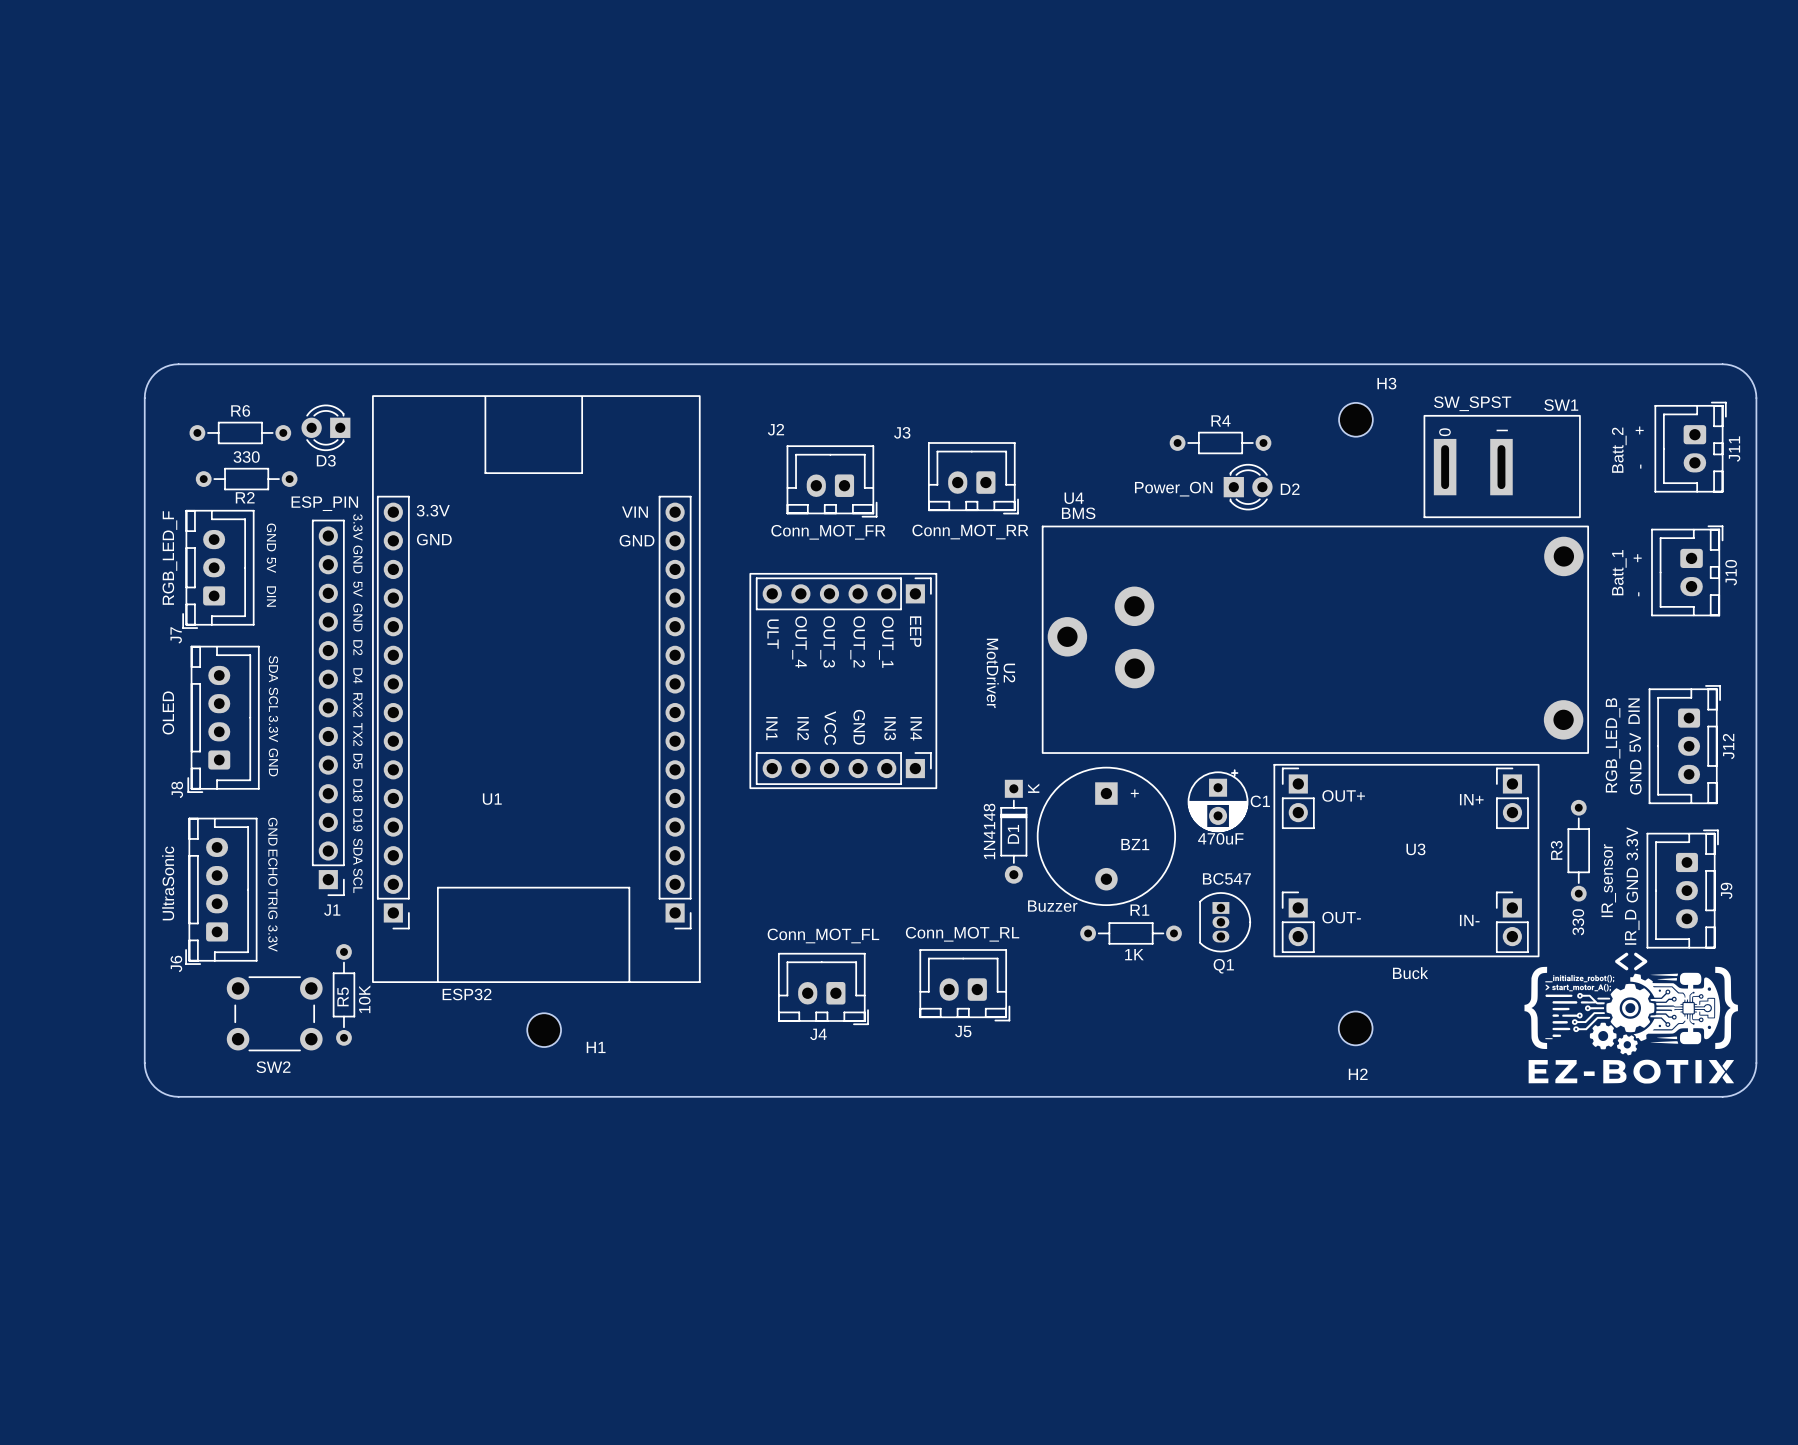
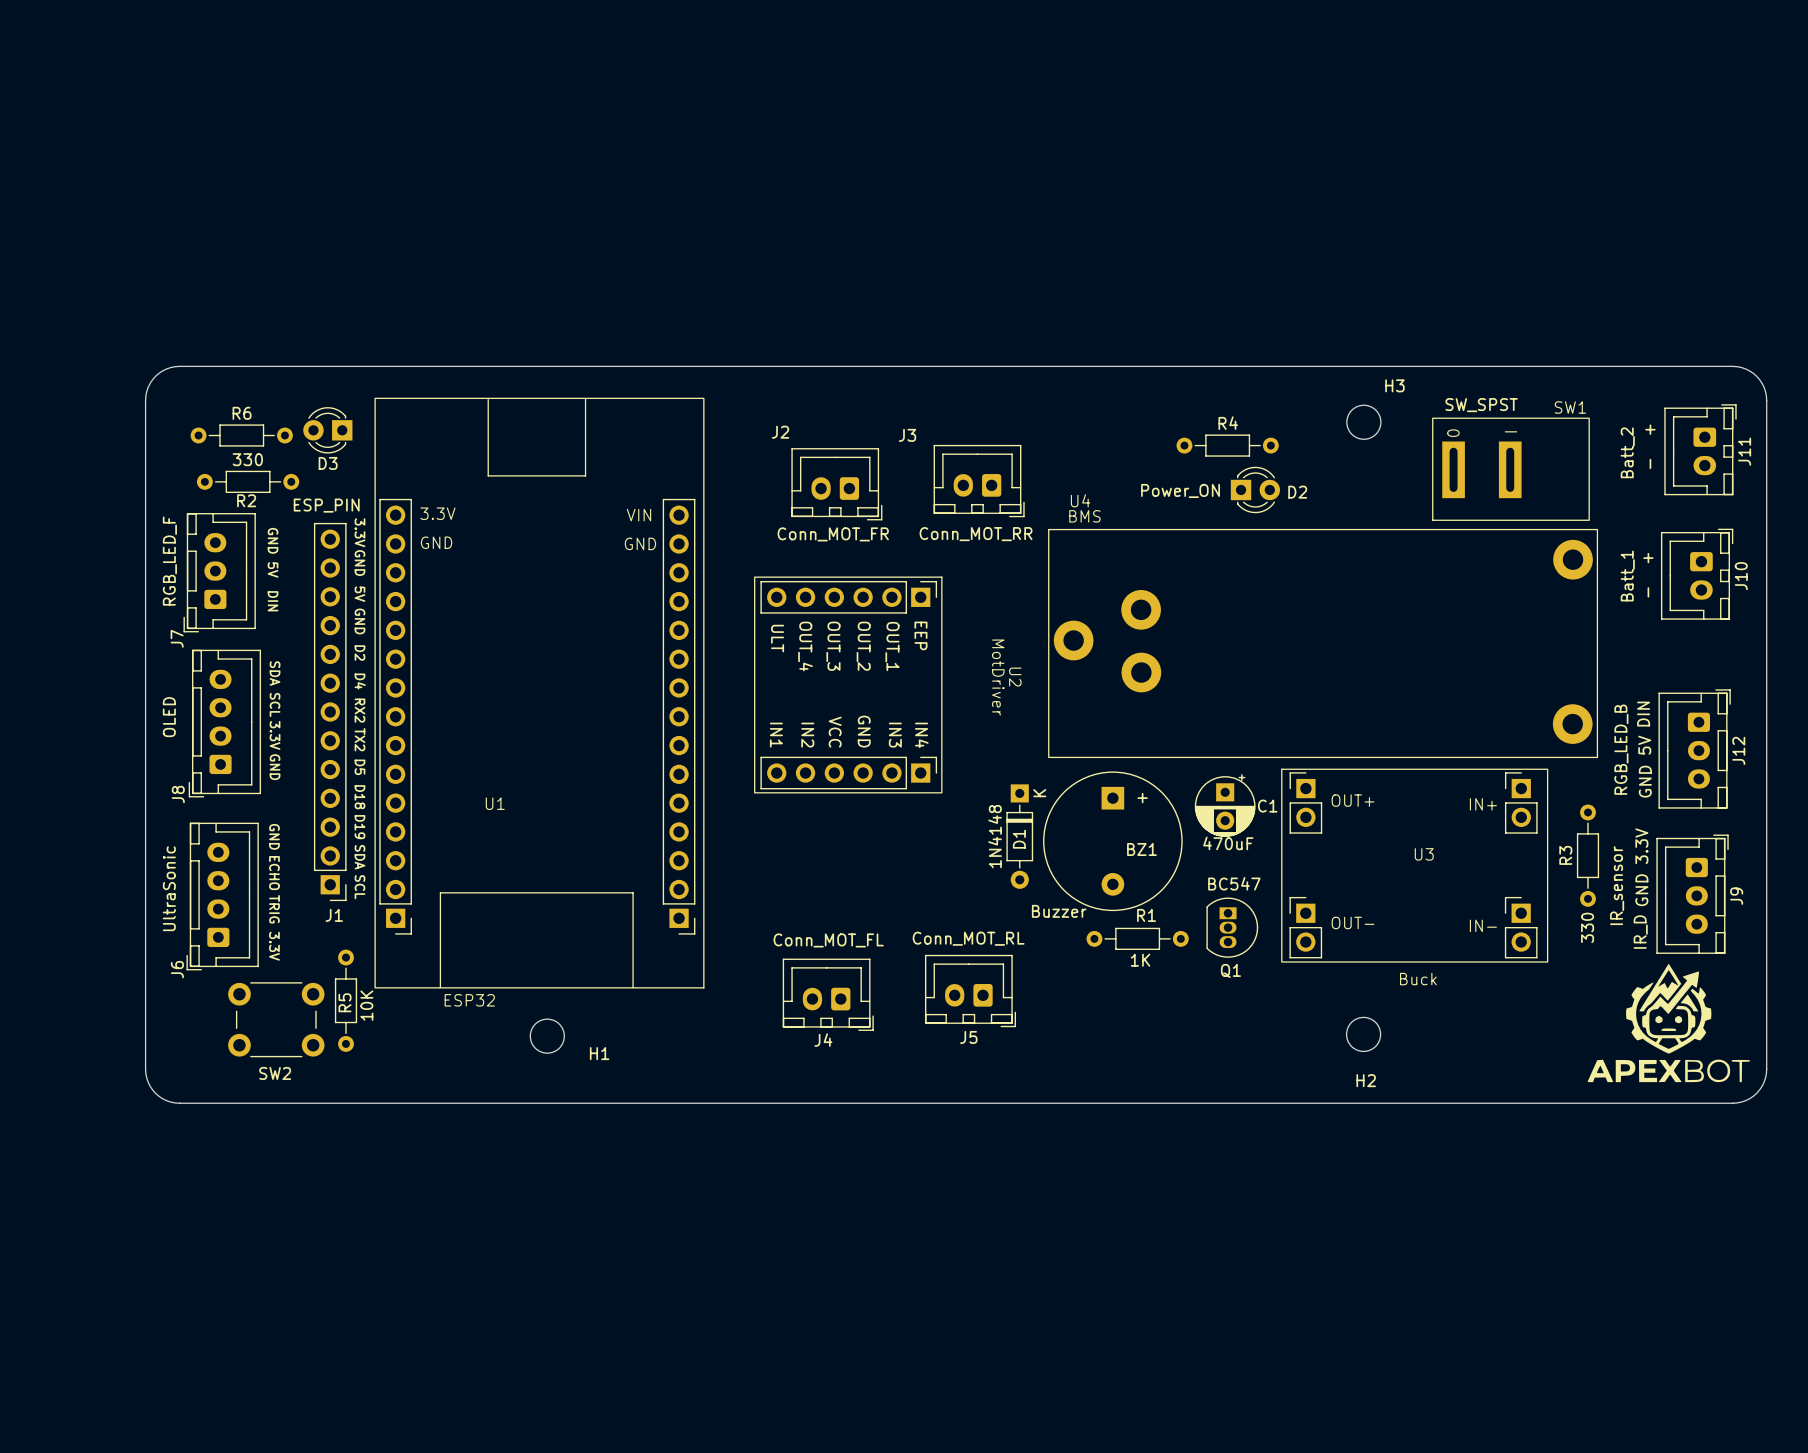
drawing: [1524, 952, 1738, 1084] -> none
drawing: none -> [1587, 963, 1750, 1083]

